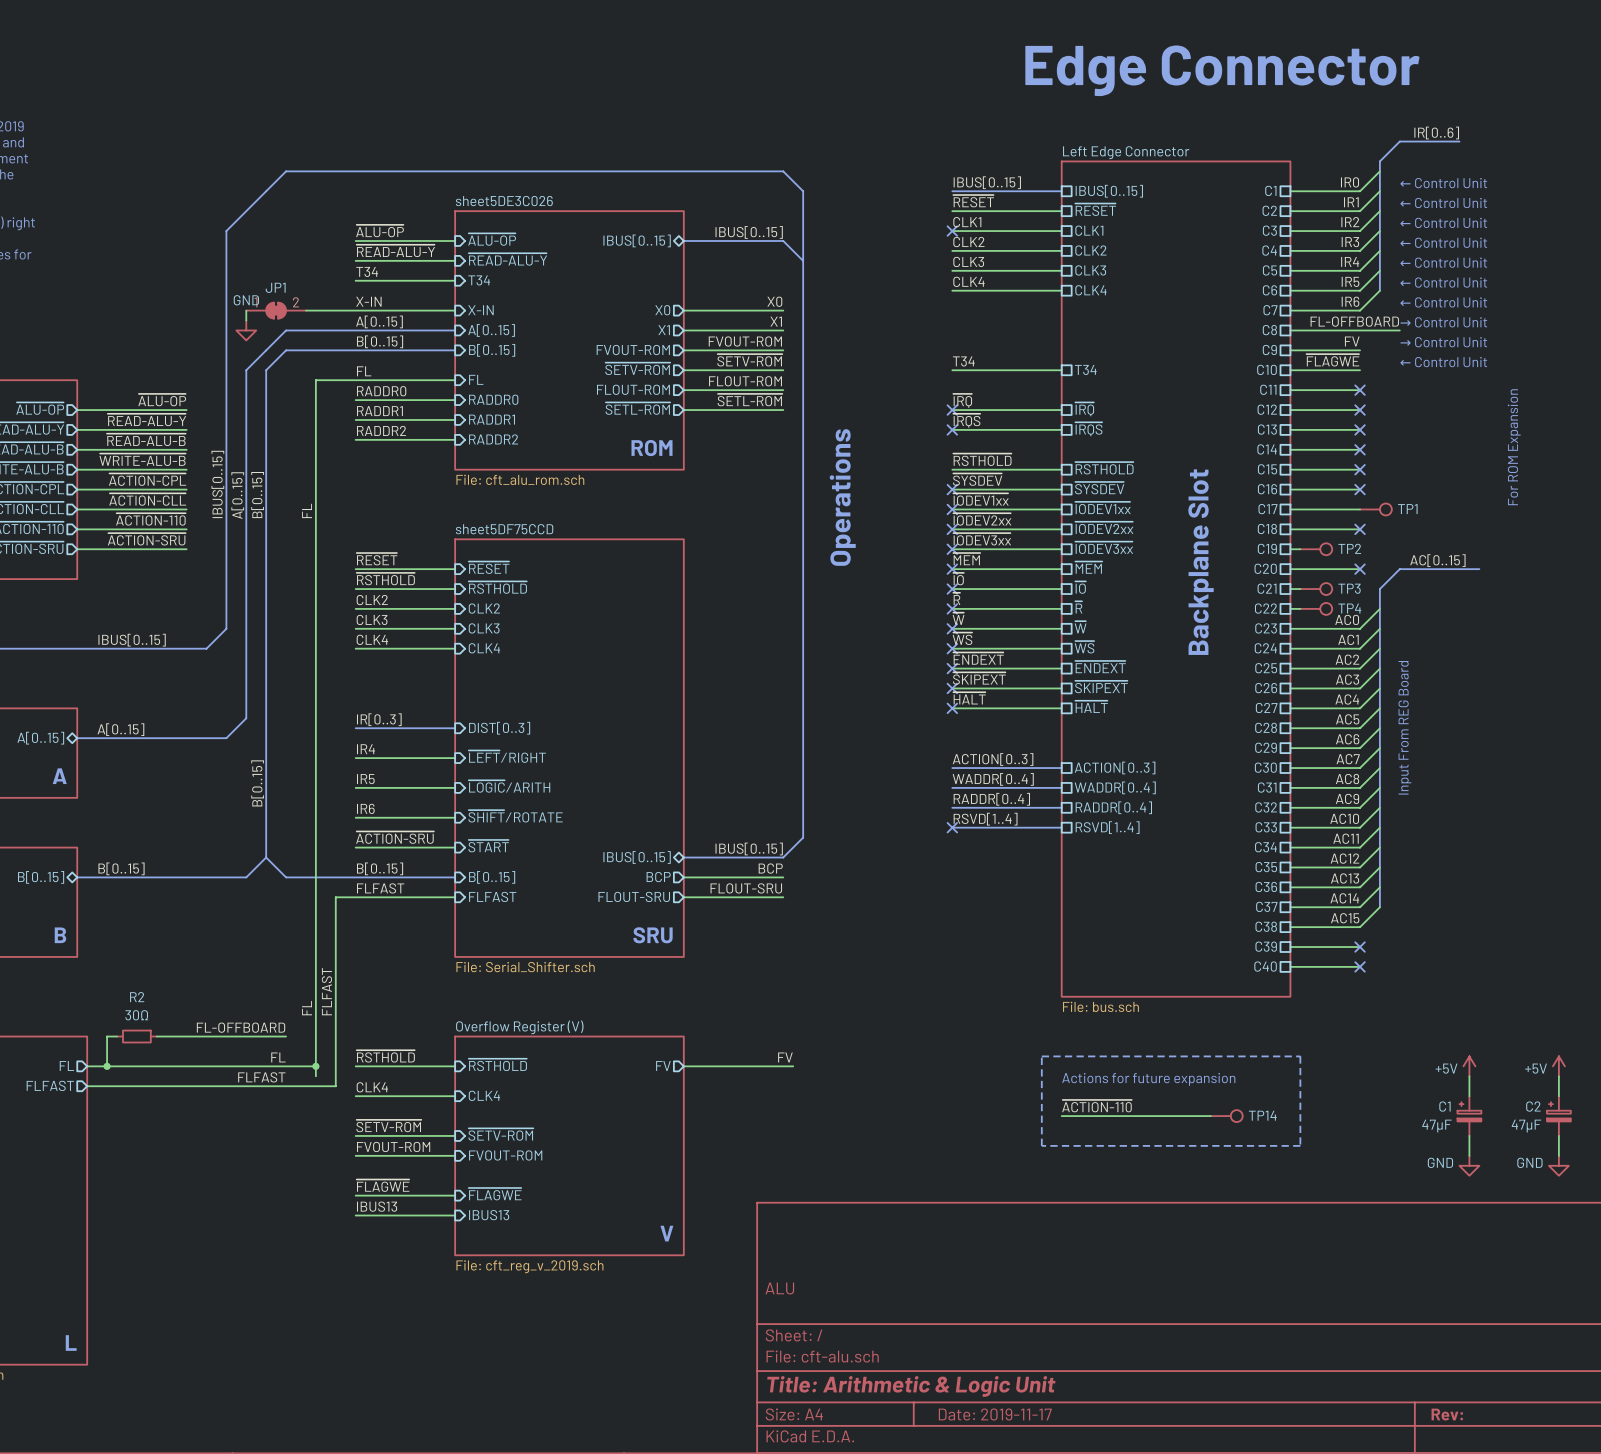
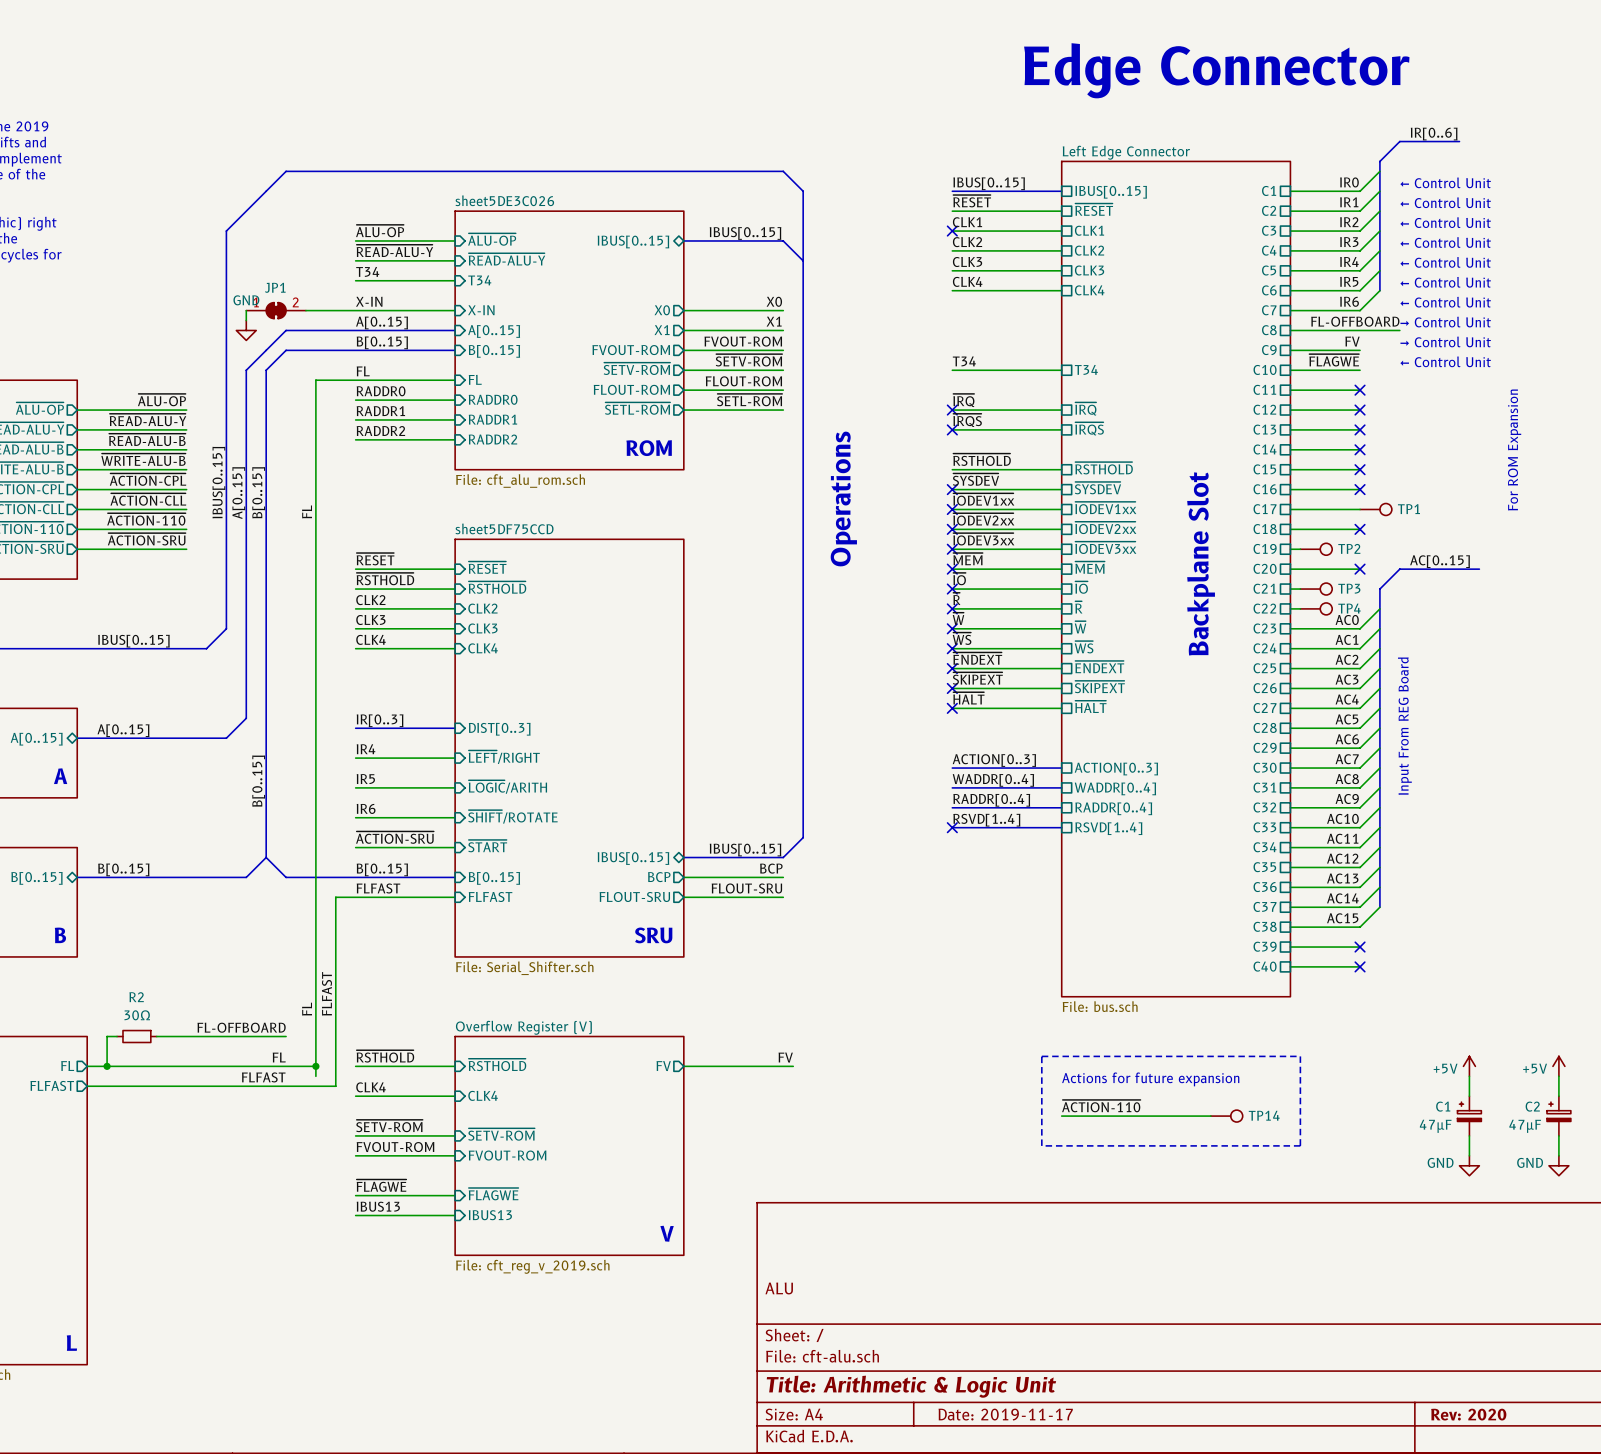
title block: Rev: (1447, 1414) -> Rev: 2020 (1468, 1414)

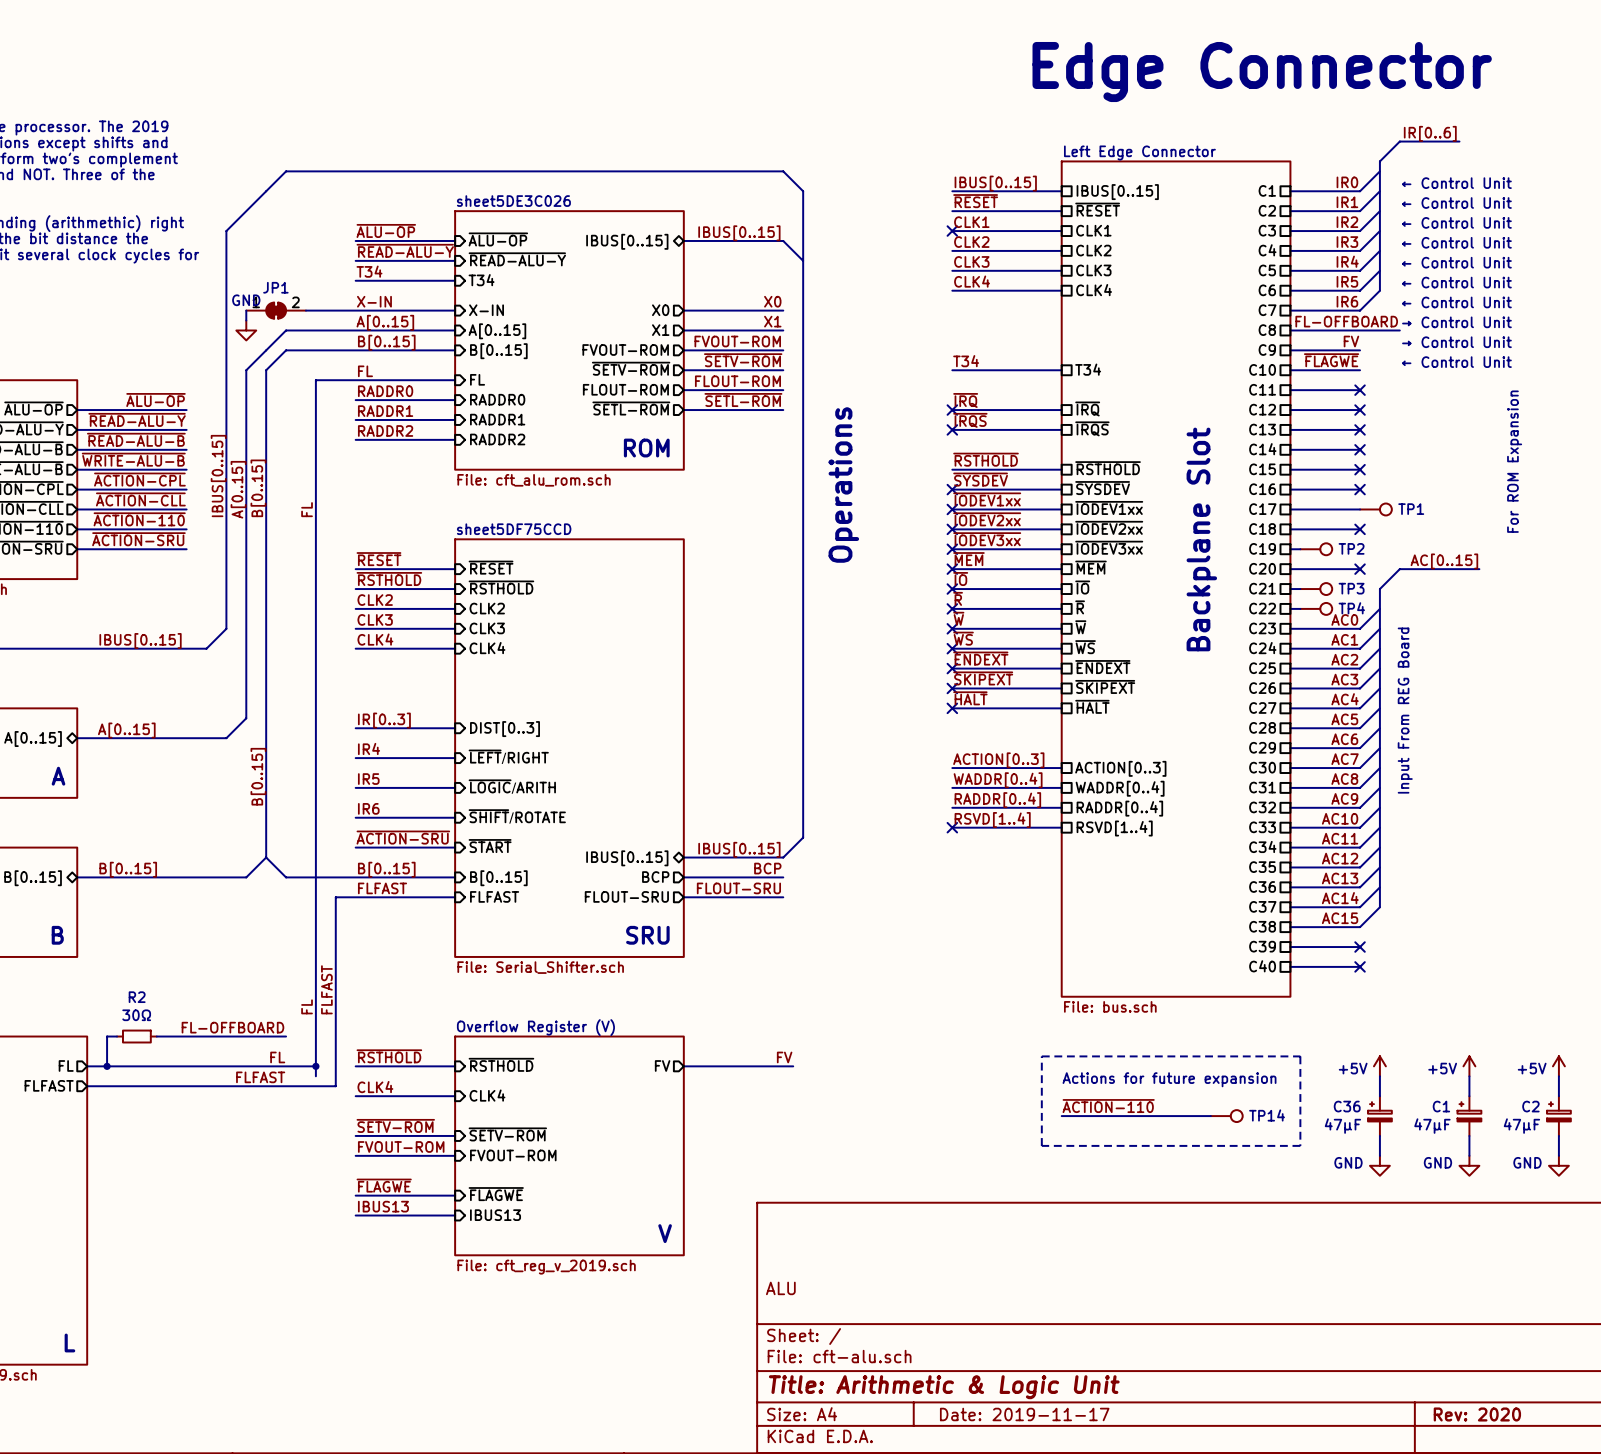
power symbol: none -> +5V (1379, 1066)
wire: none -> (1379, 1076) (1379, 1096)
C36: none -> 47µF (1379, 1116)
wire: none -> (1379, 1135) (1379, 1155)
power symbol: none -> GND (1379, 1165)

